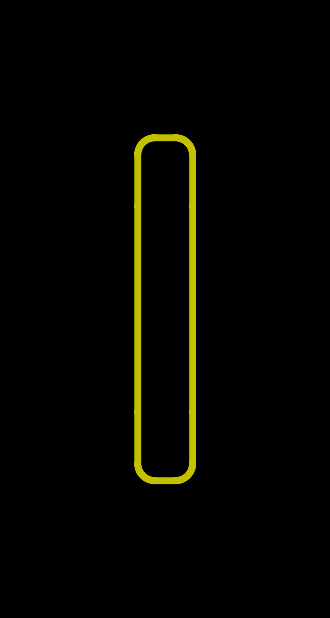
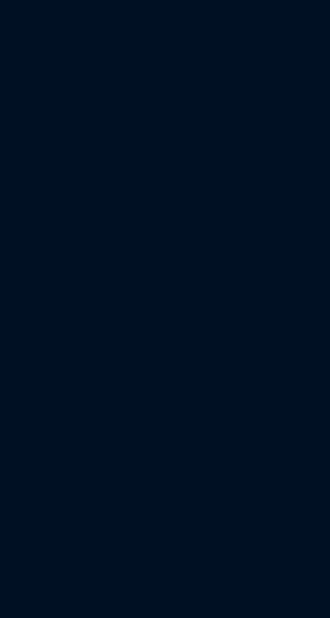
board edge: (152, 137) (141, 144) (137, 154) (137, 465) (141, 473) (148, 479) (177, 480) (189, 473) (192, 463) (192, 152) (189, 144) (182, 139) (152, 137) -> none

